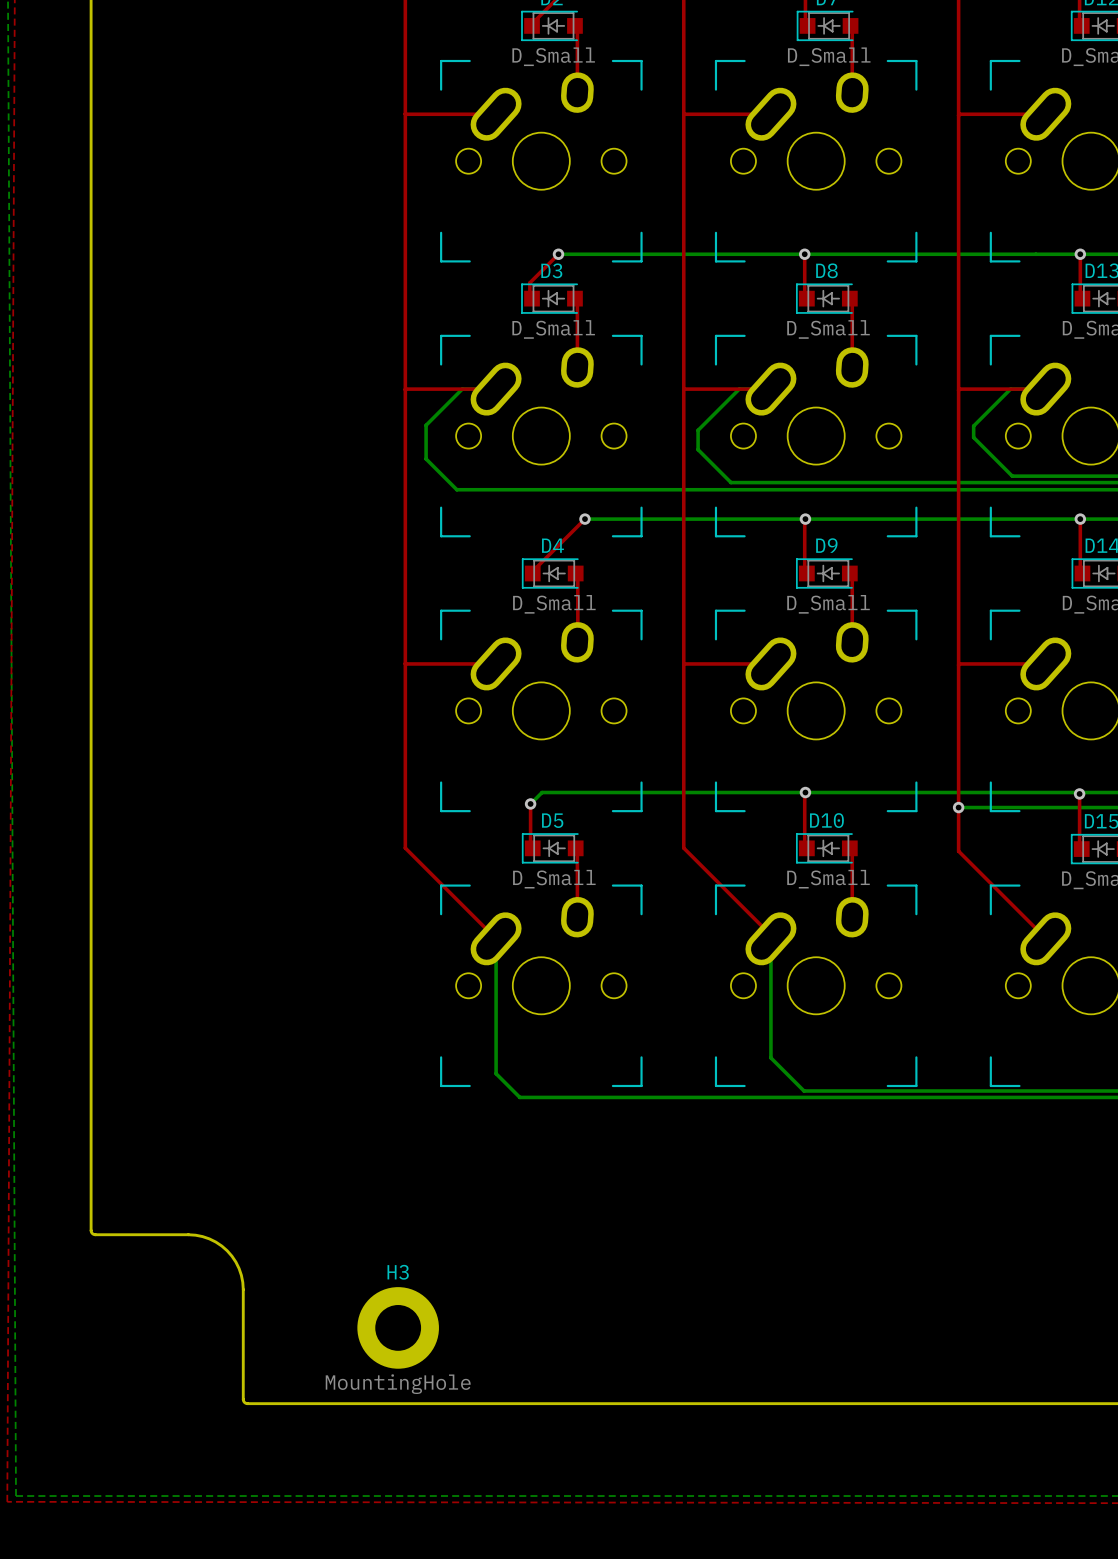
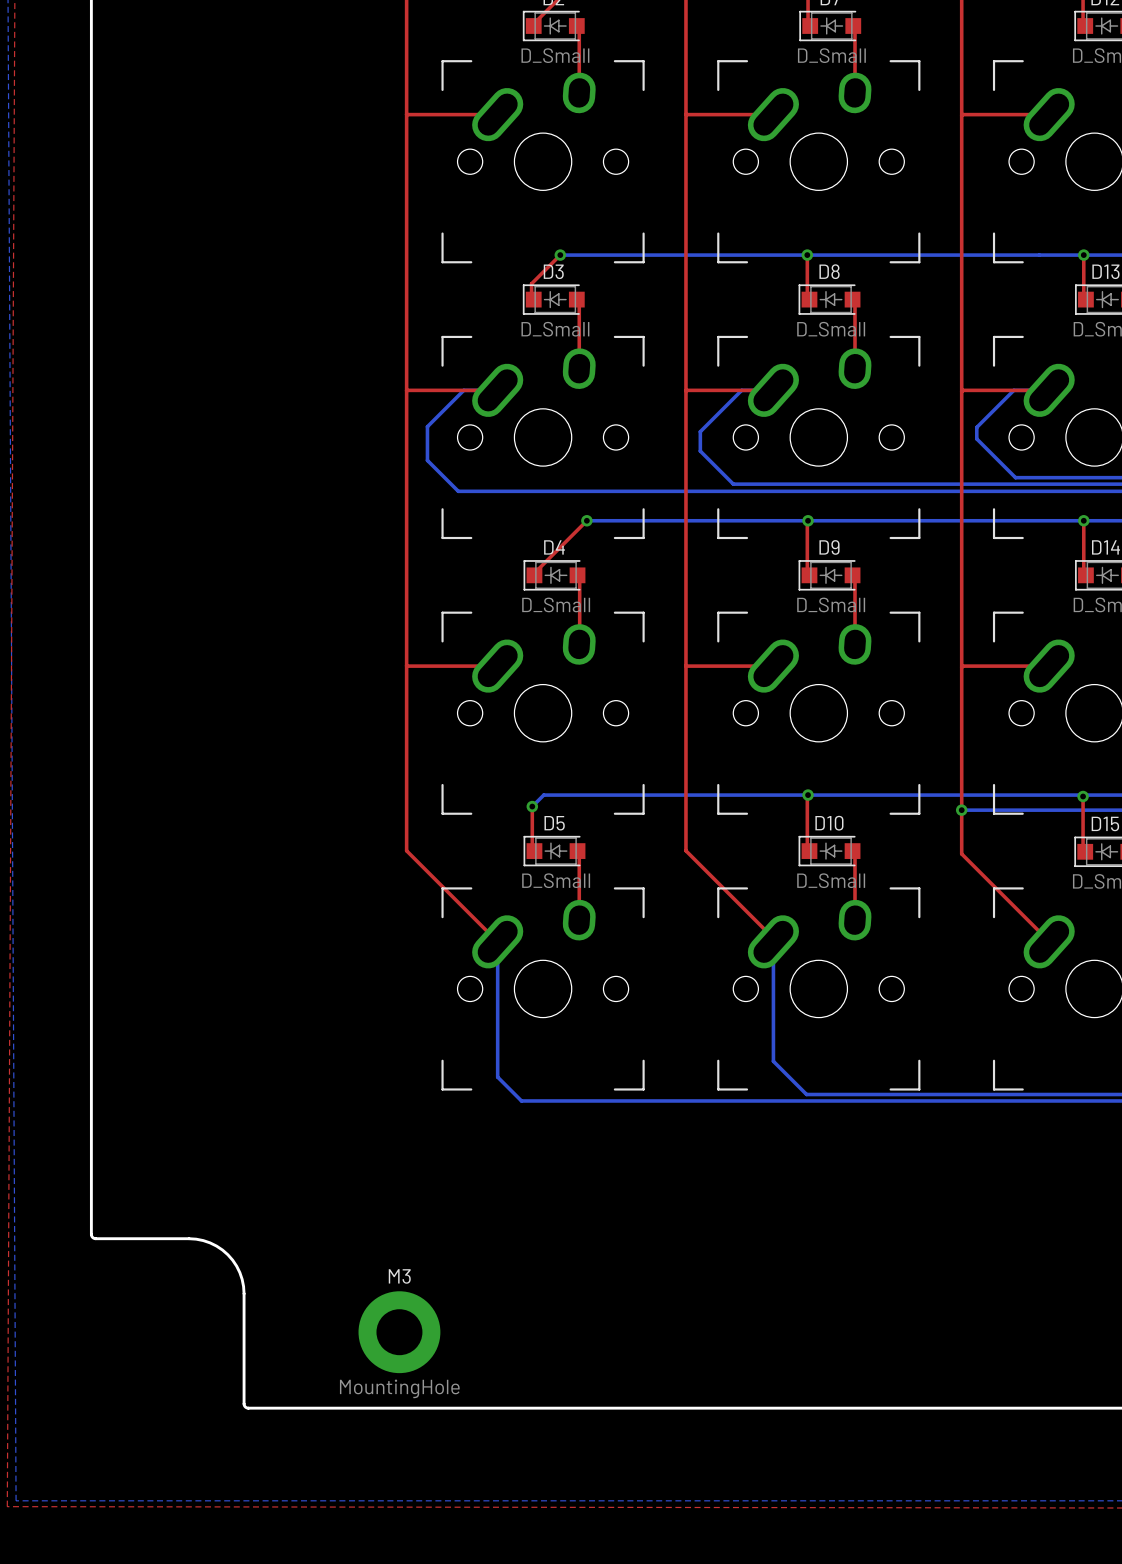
H3 name: H3 (398, 1272) -> M3 (399, 1276)

